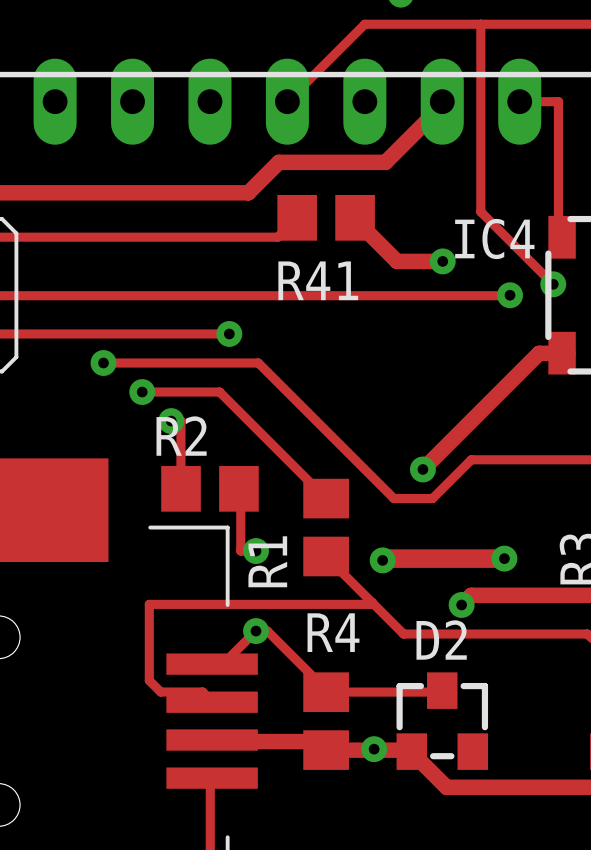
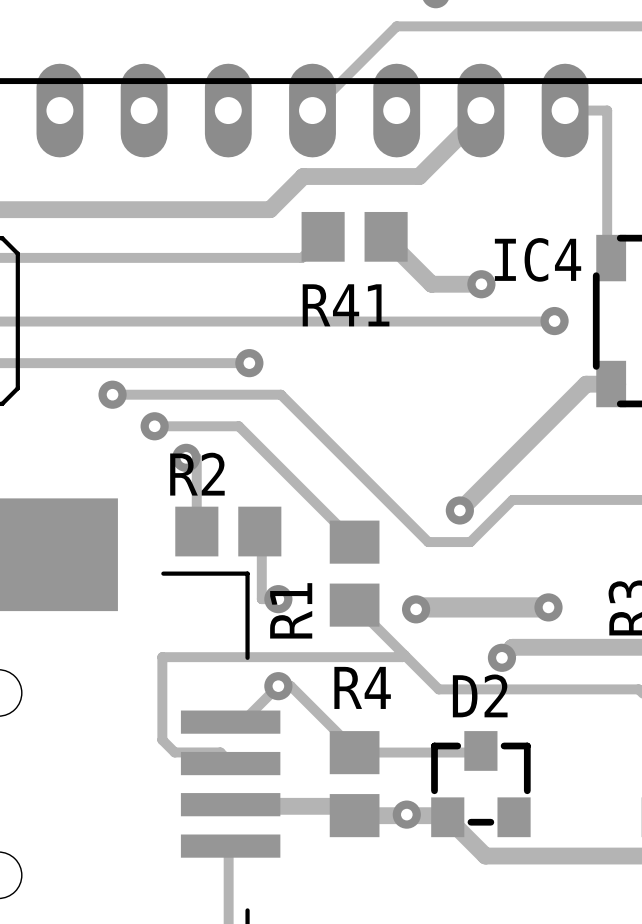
track: (480, 24) (480, 211) (553, 284) -> none
via: (553, 284) -> none

